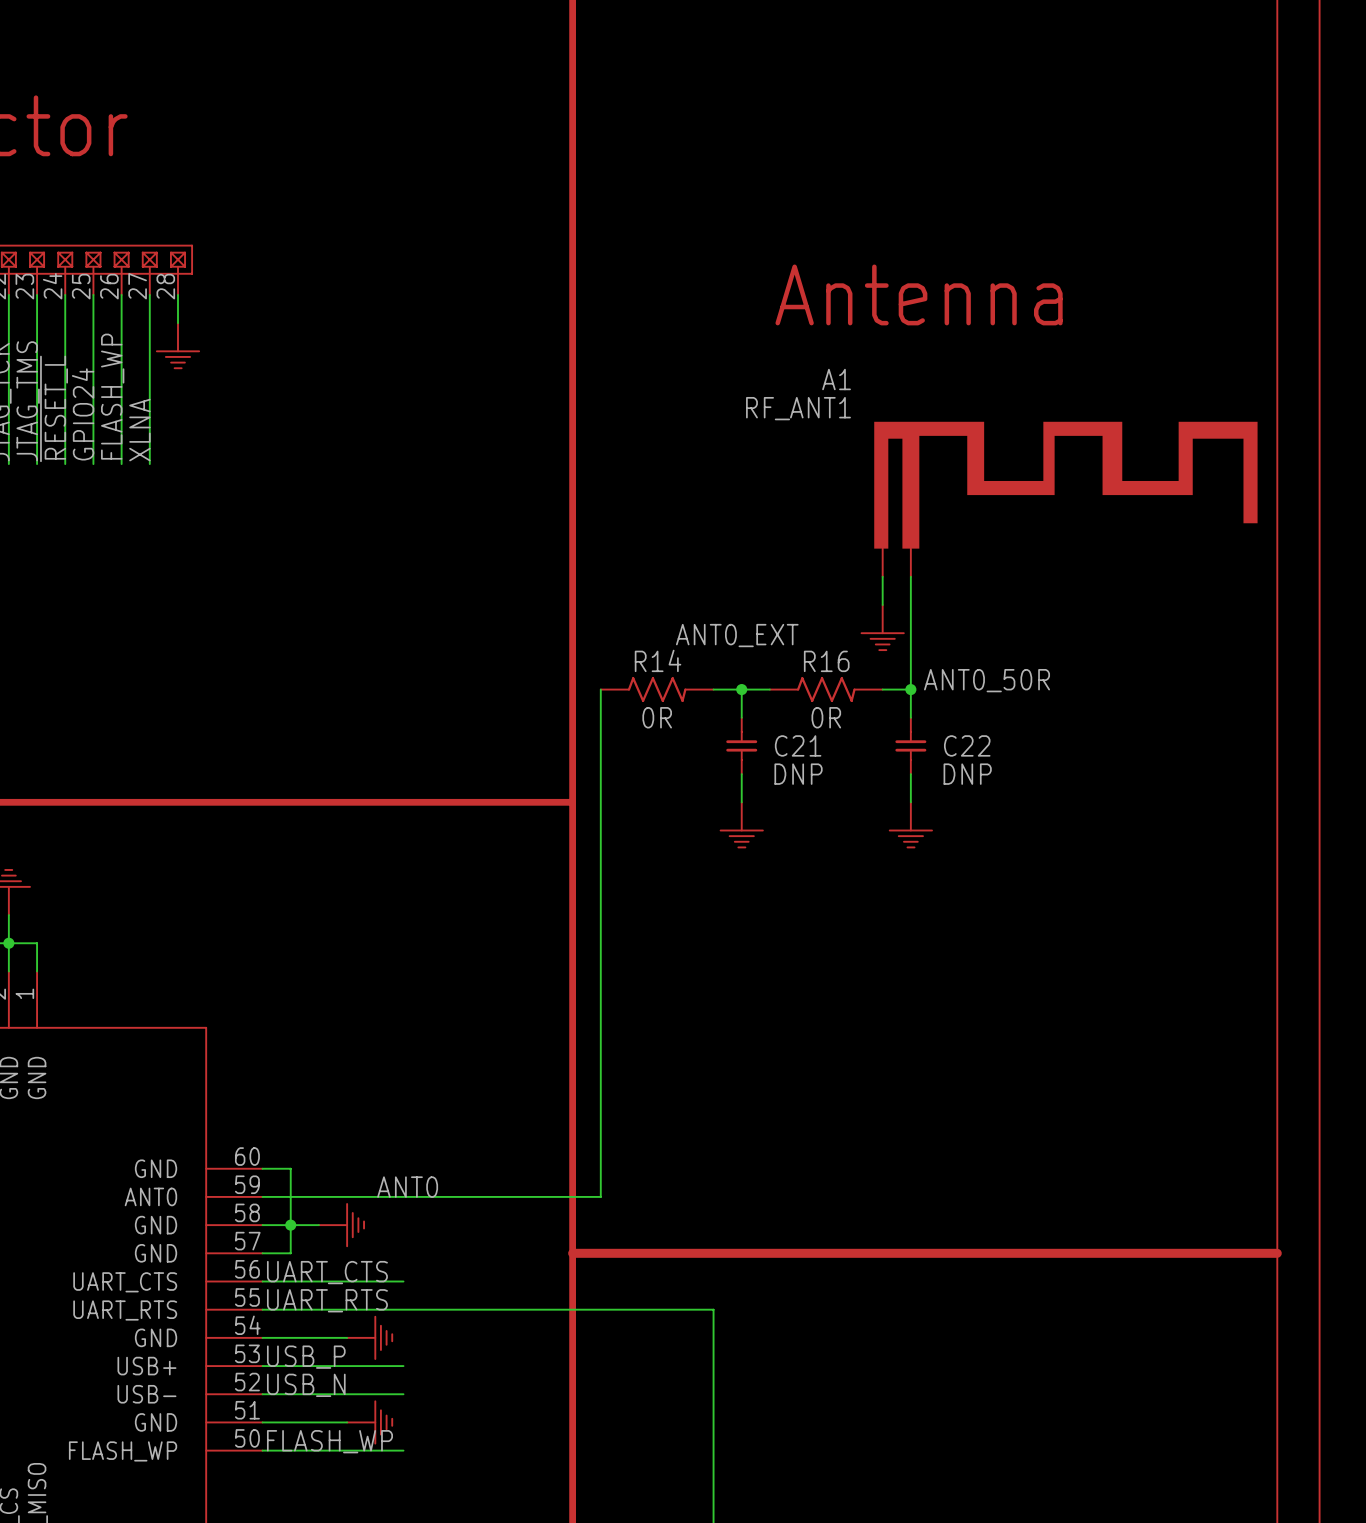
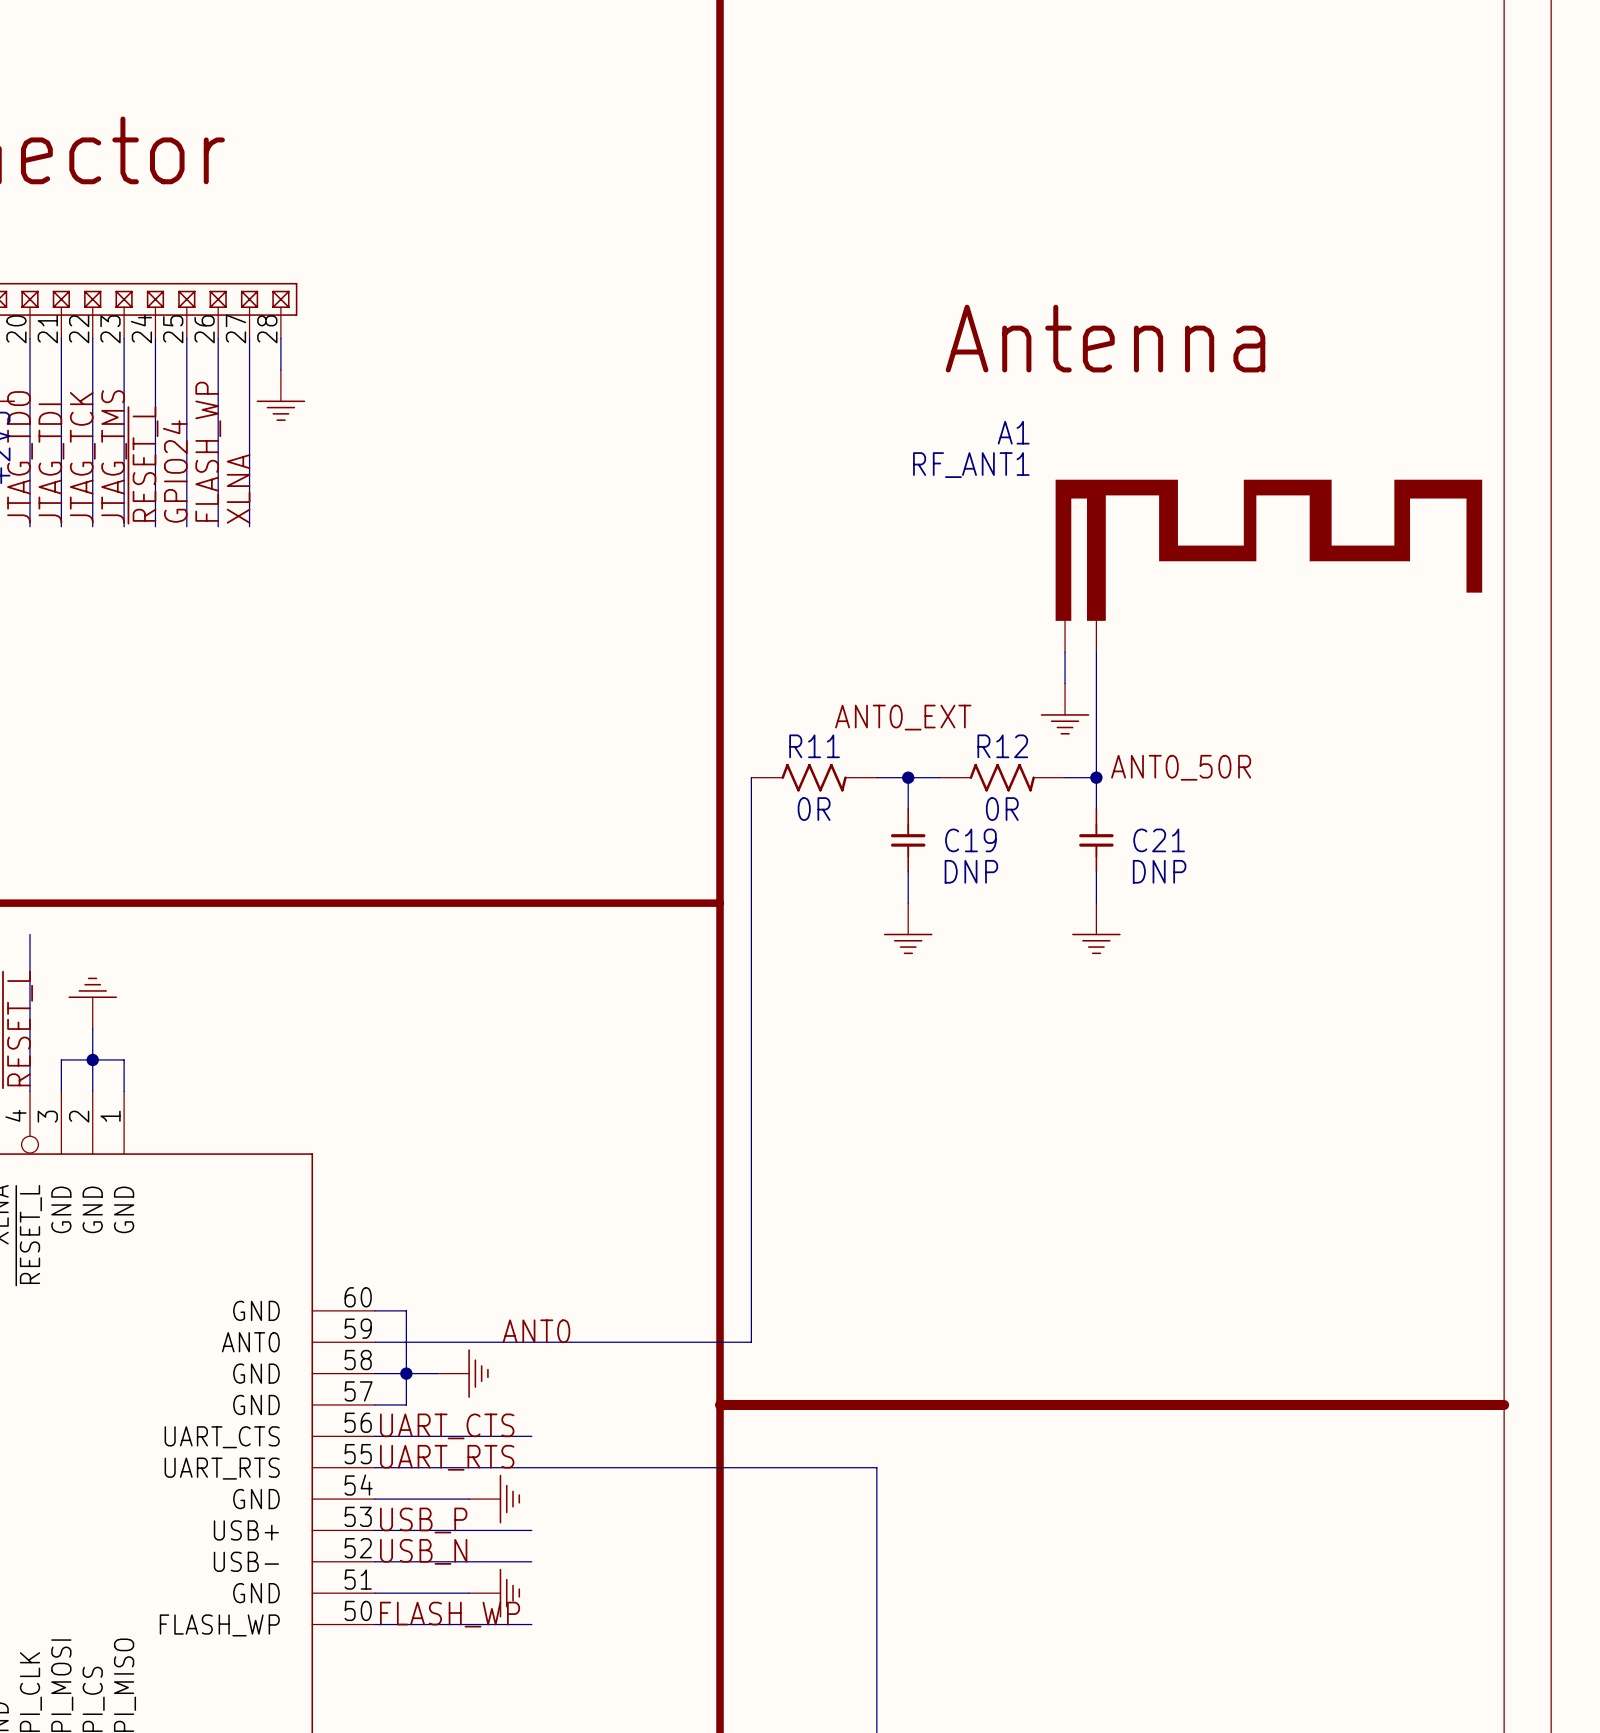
R14 name: R14 (658, 660) -> R11 (814, 746)
R16 name: R16 (826, 661) -> R12 (1002, 746)
C21 name: C21 (798, 745) -> C19 (970, 840)
C22 name: C22 (967, 745) -> C21 (1159, 840)

